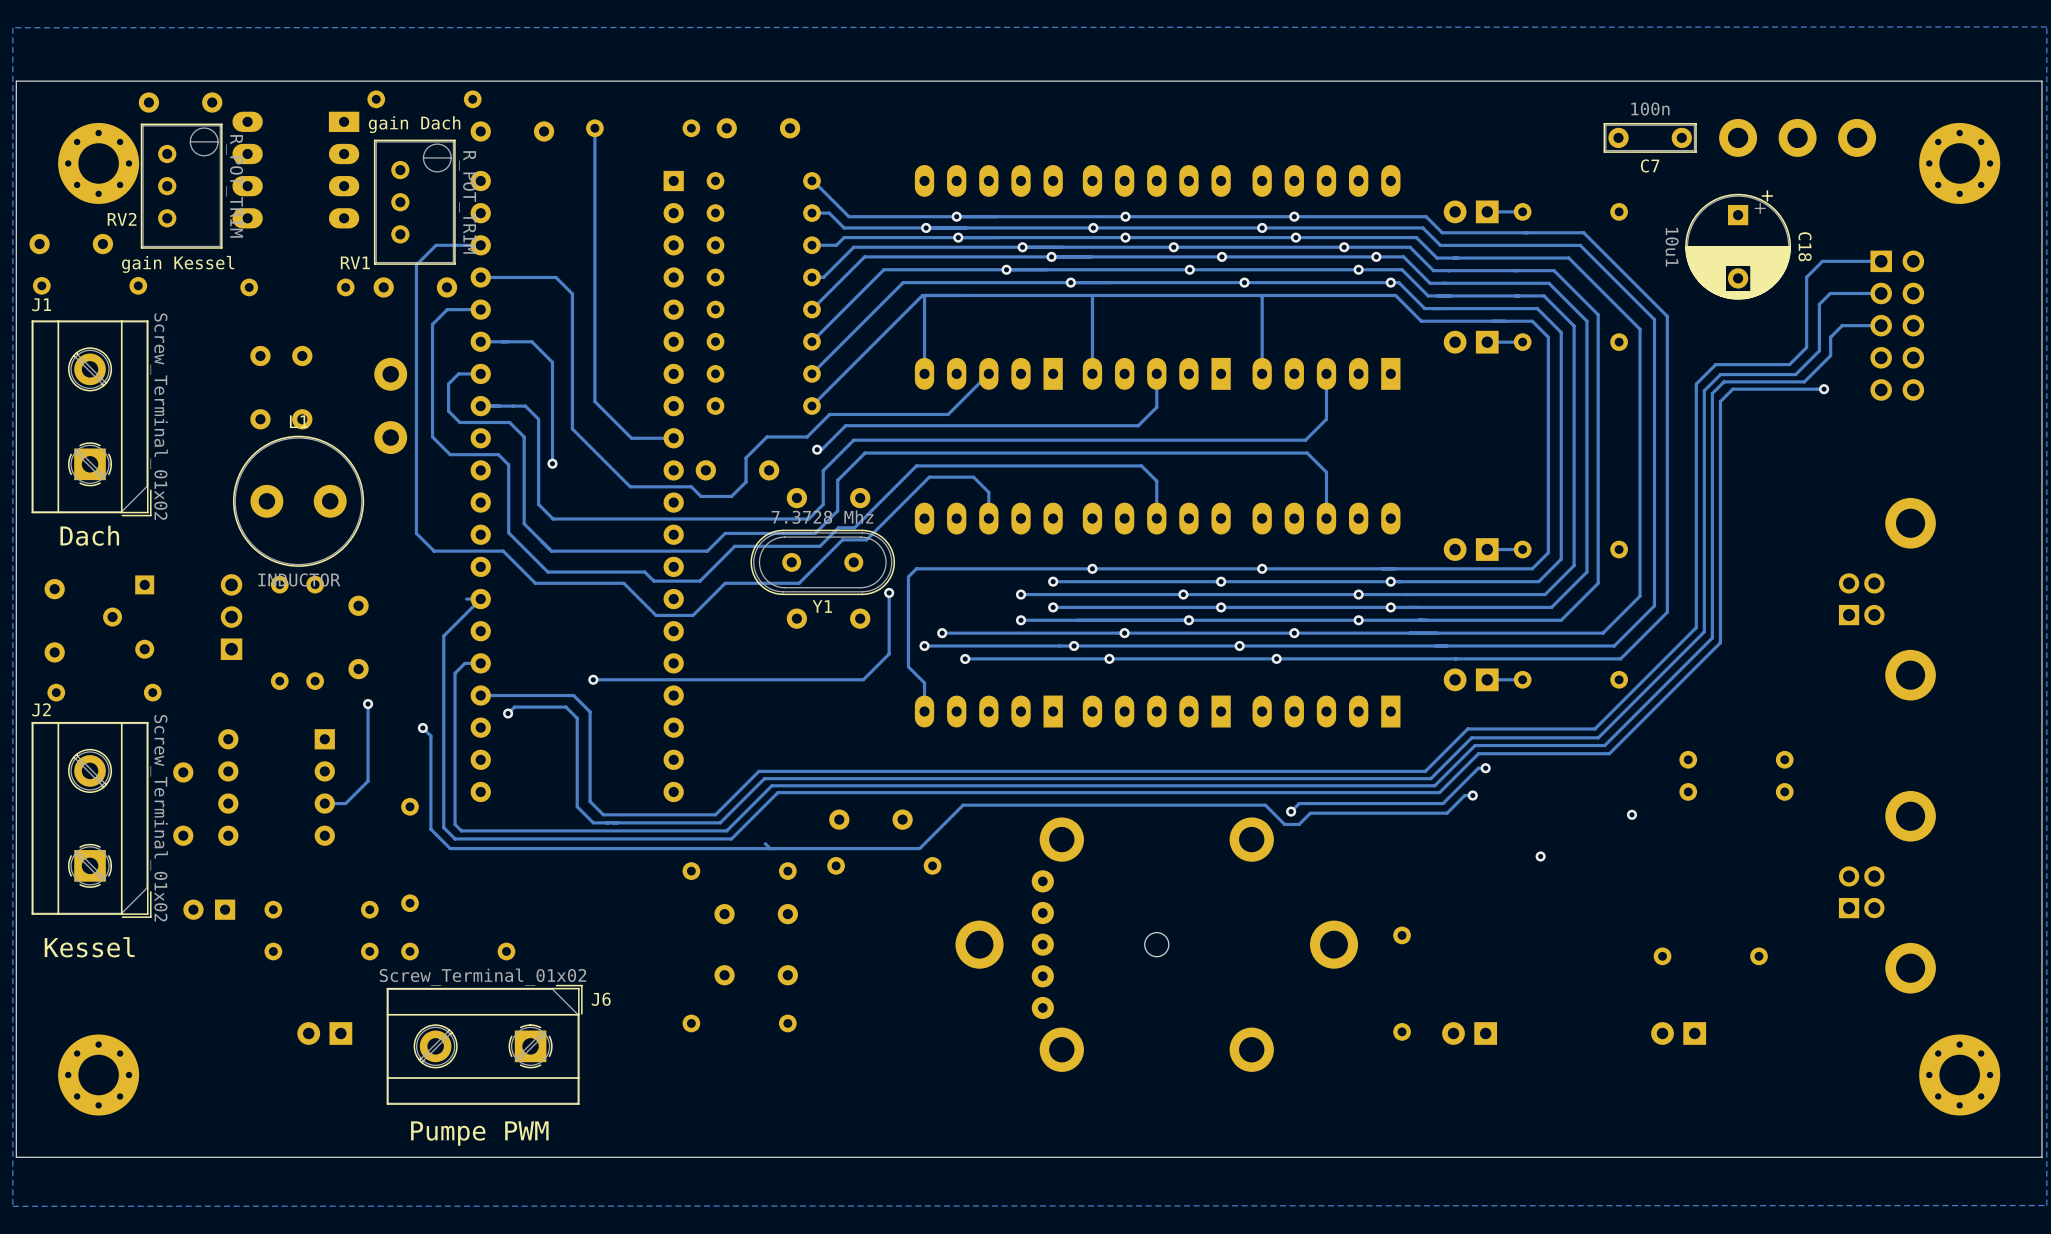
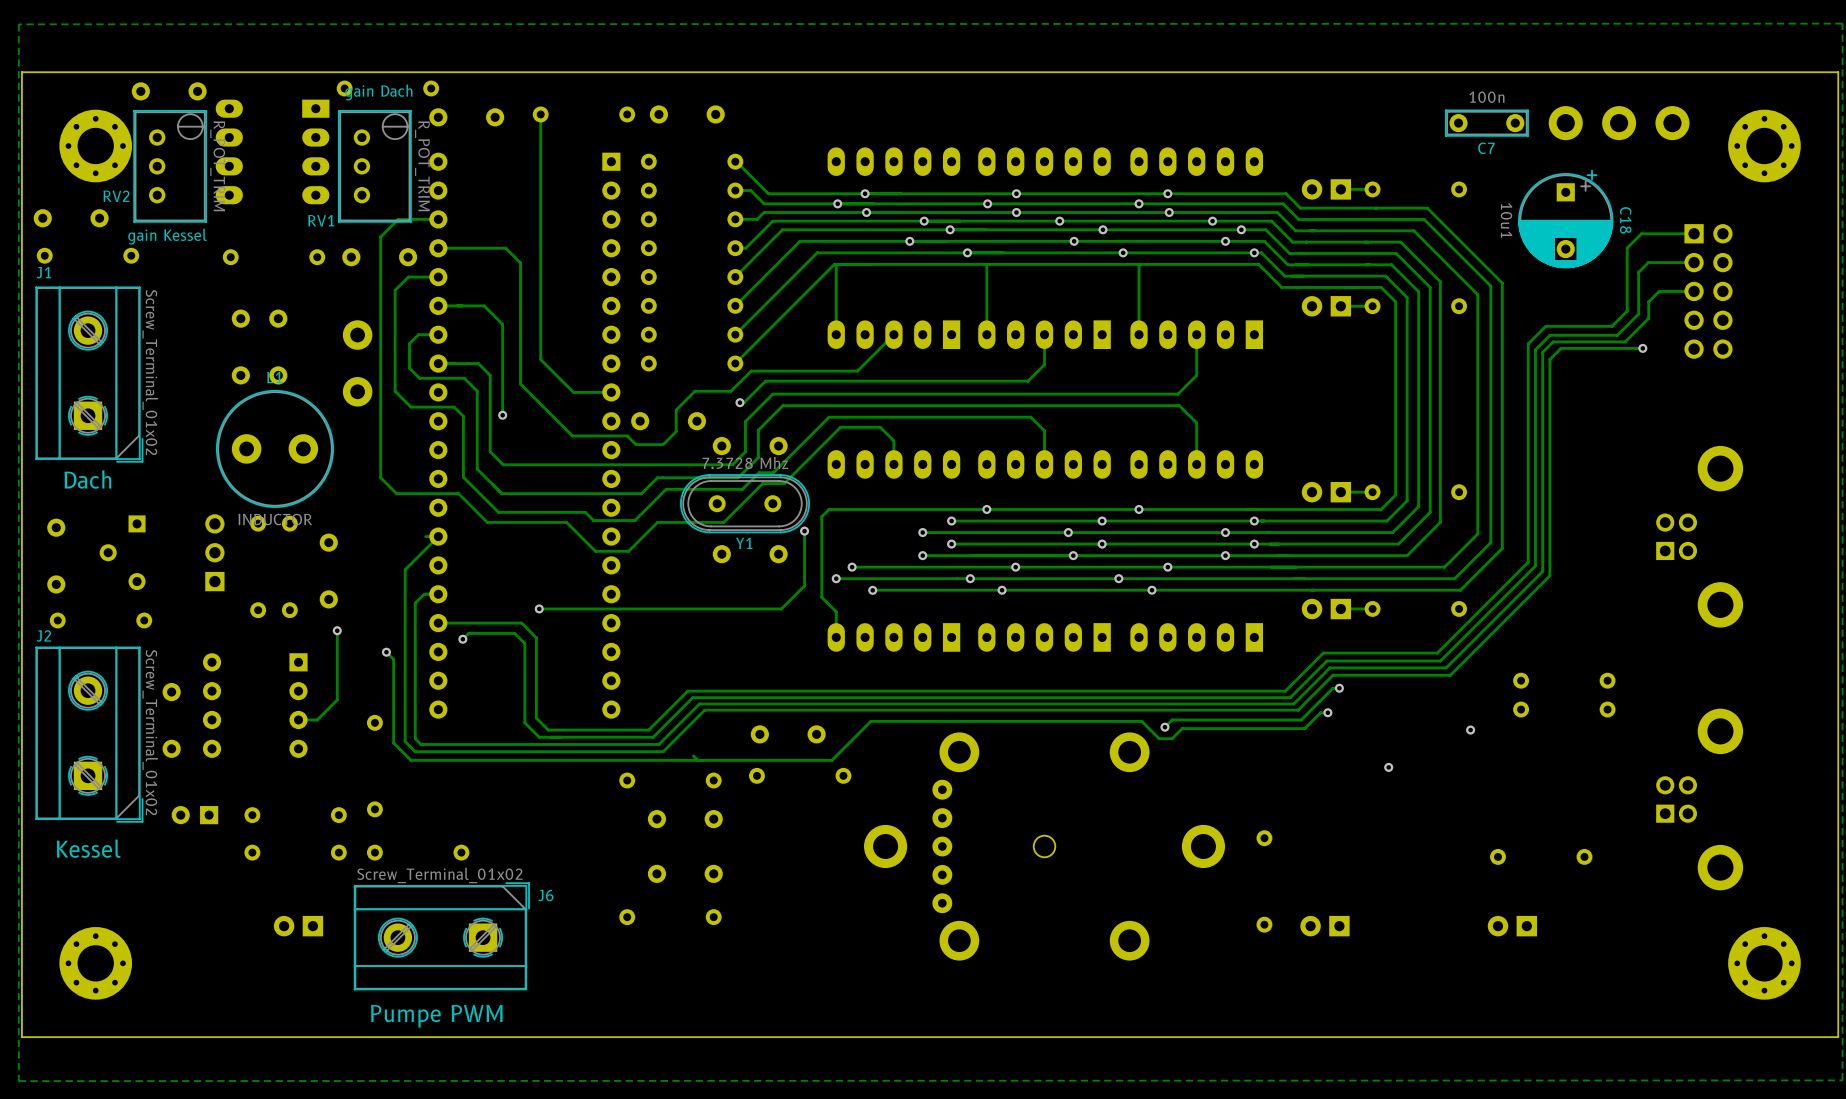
text position: gain Dach (414, 124) -> gain Dach (378, 92)
RV1 position: (414, 202) -> (374, 166)

